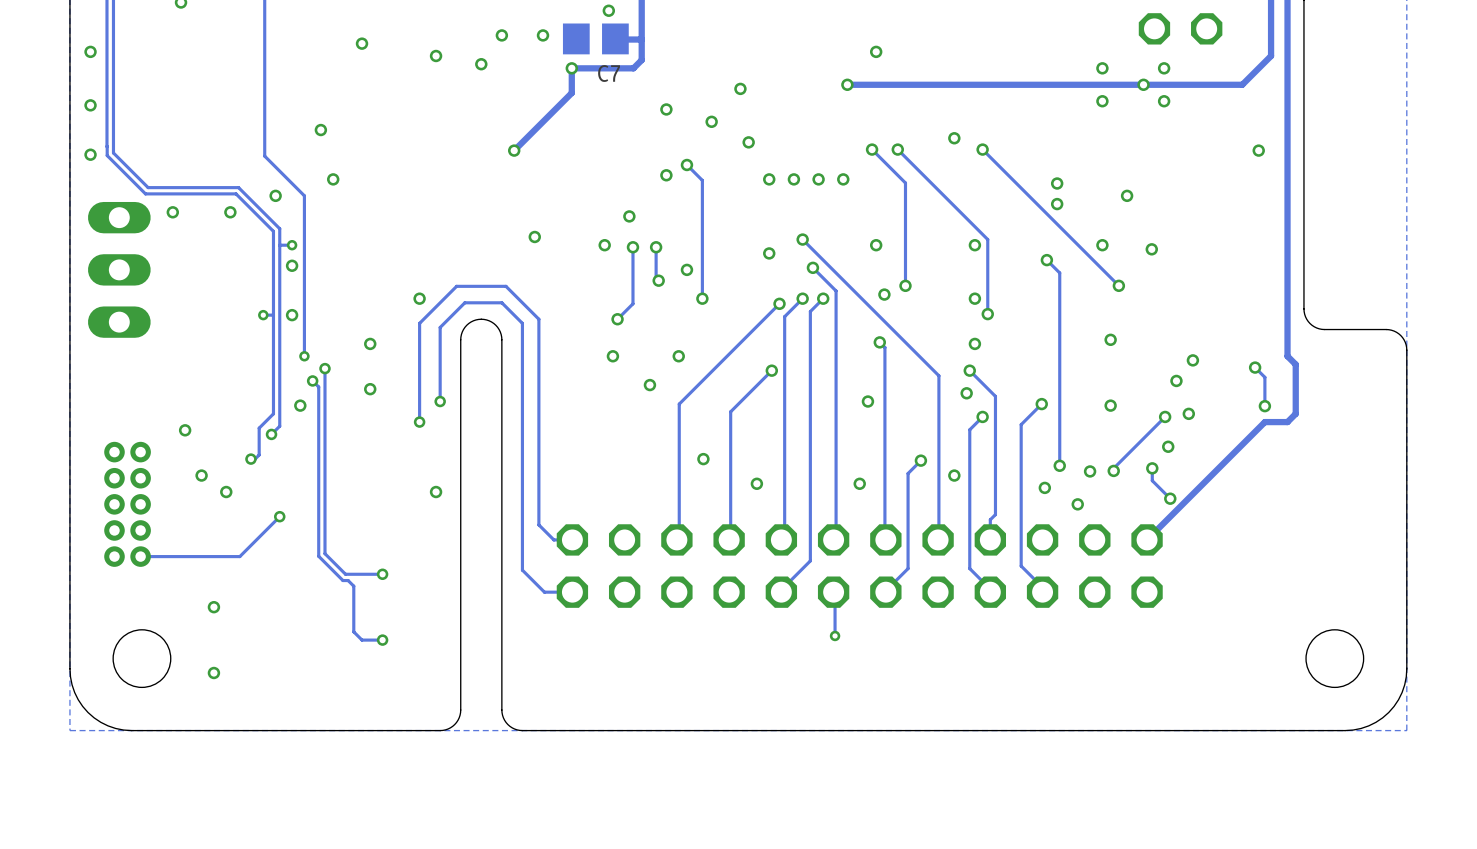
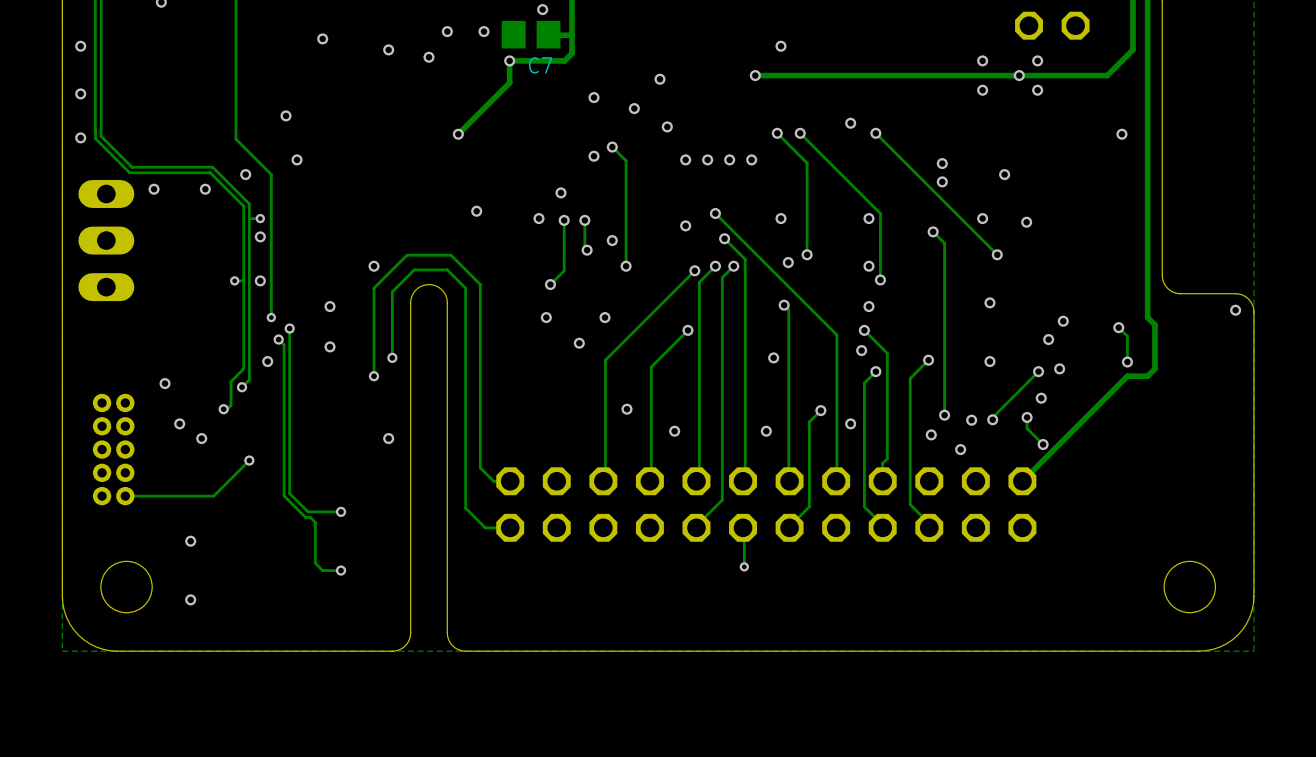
via: none -> (1235, 310)

